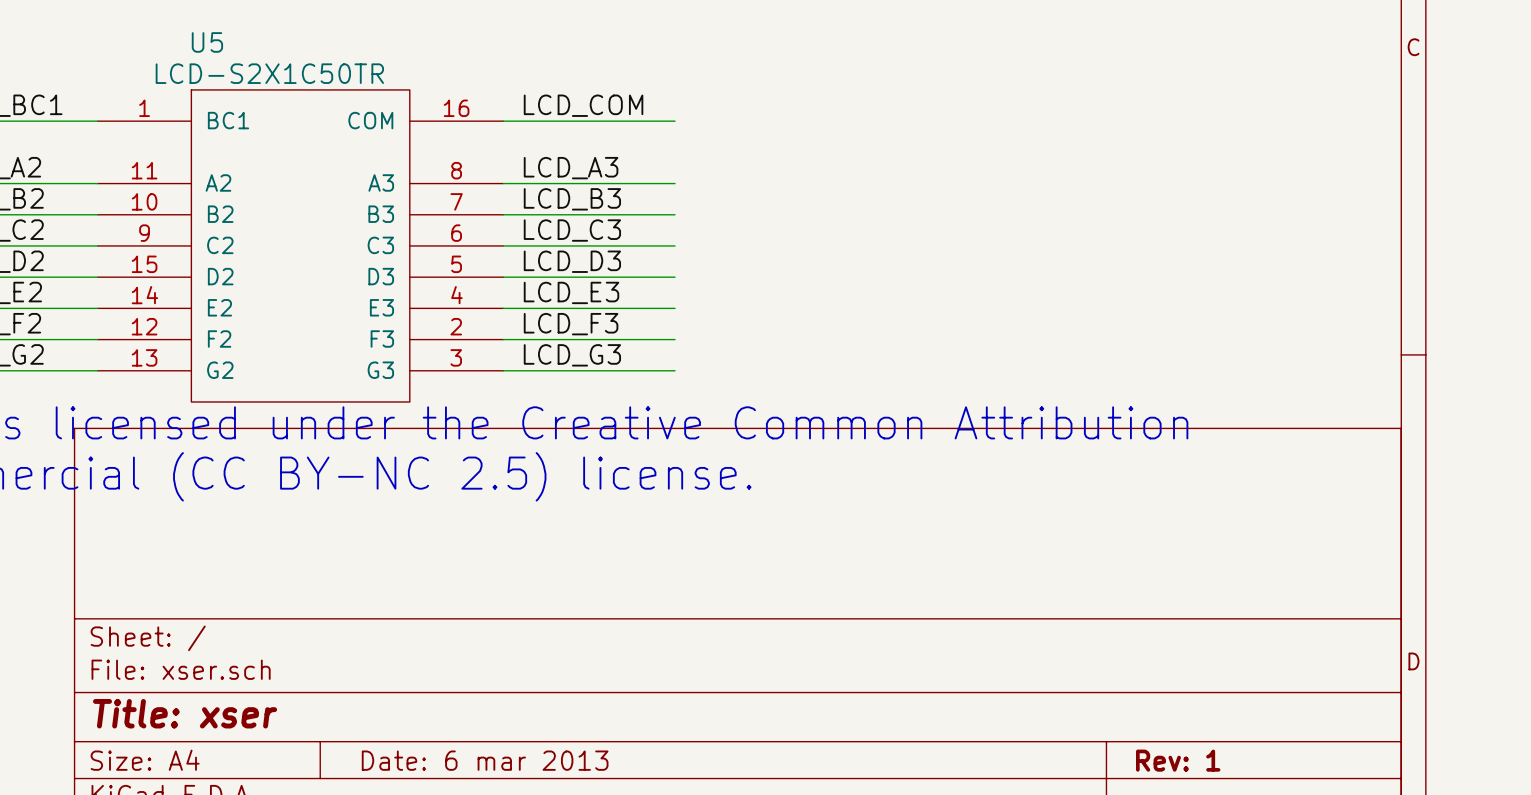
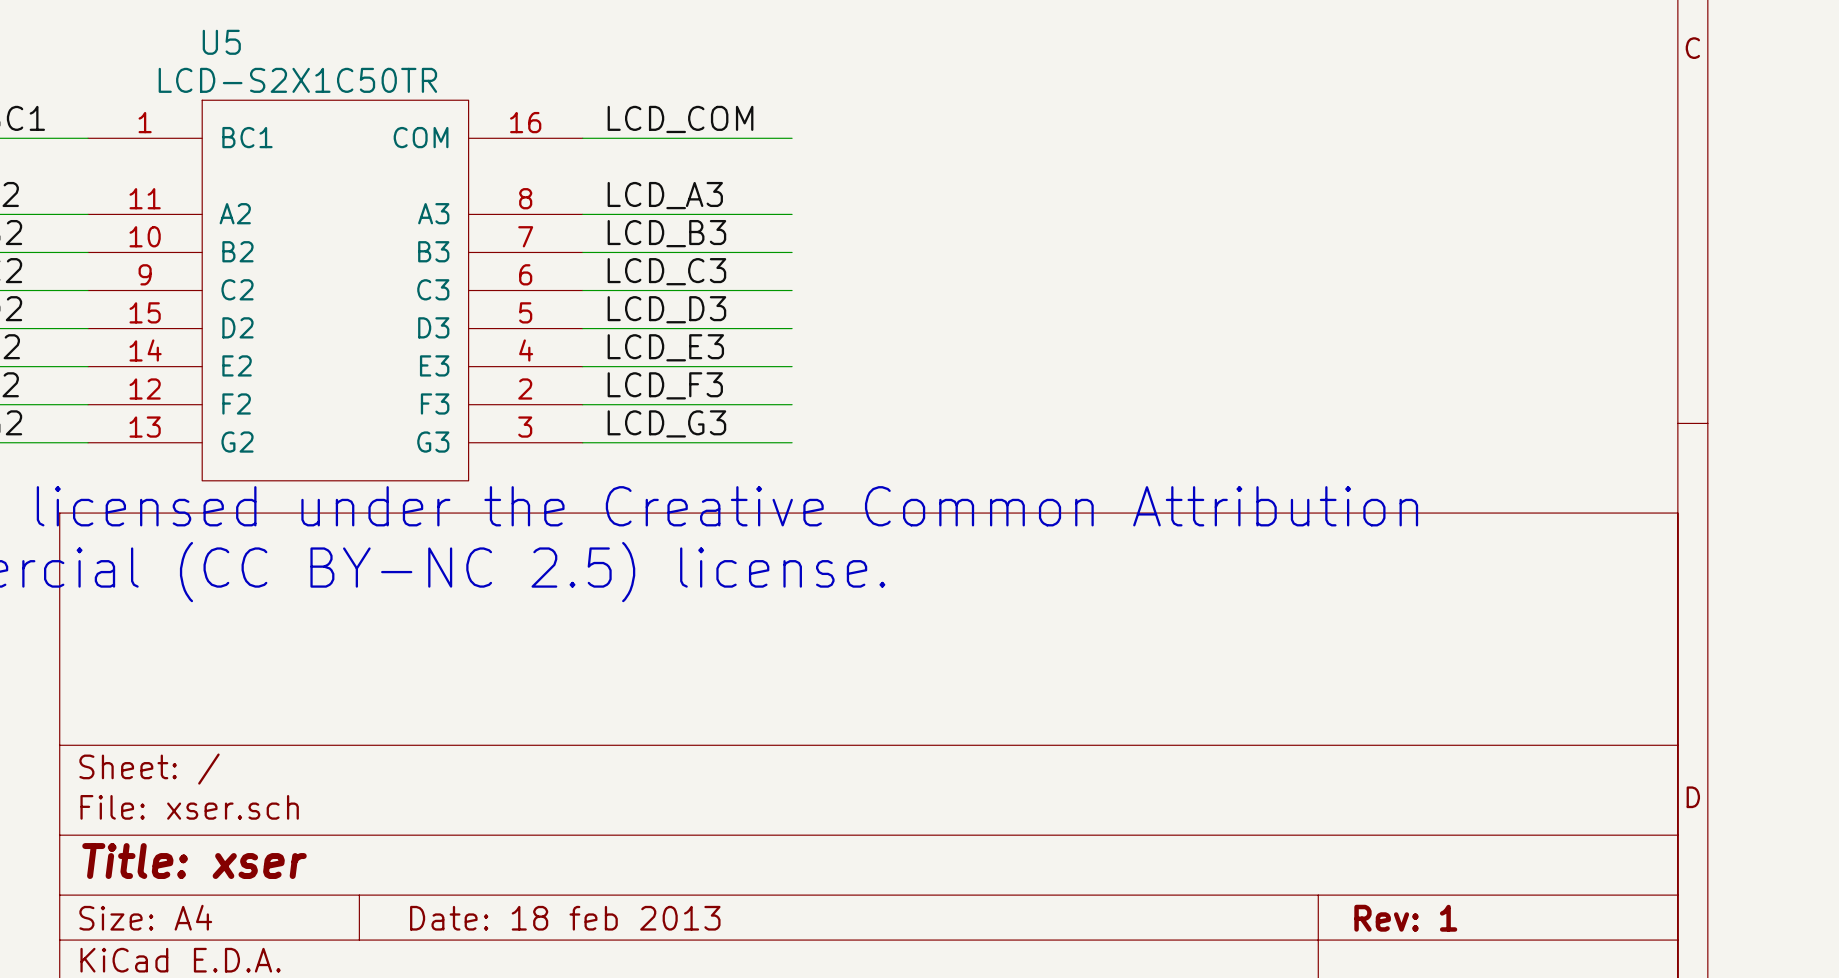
title block: Date: 6 mar 2013 (485, 760) -> Date: 18 feb 2013 (565, 918)

